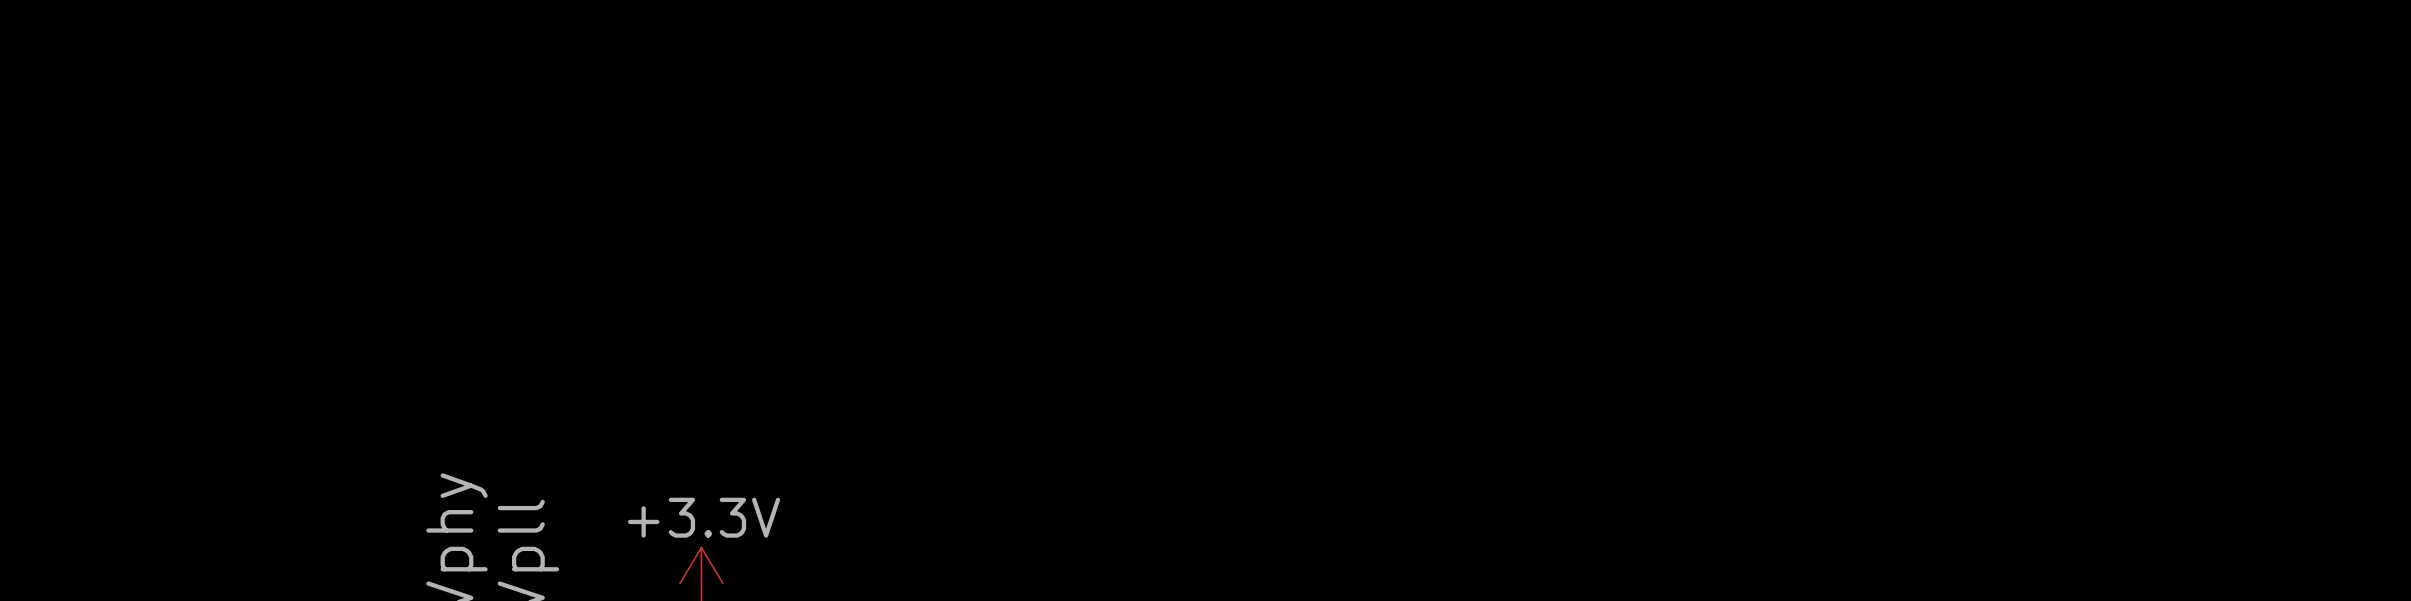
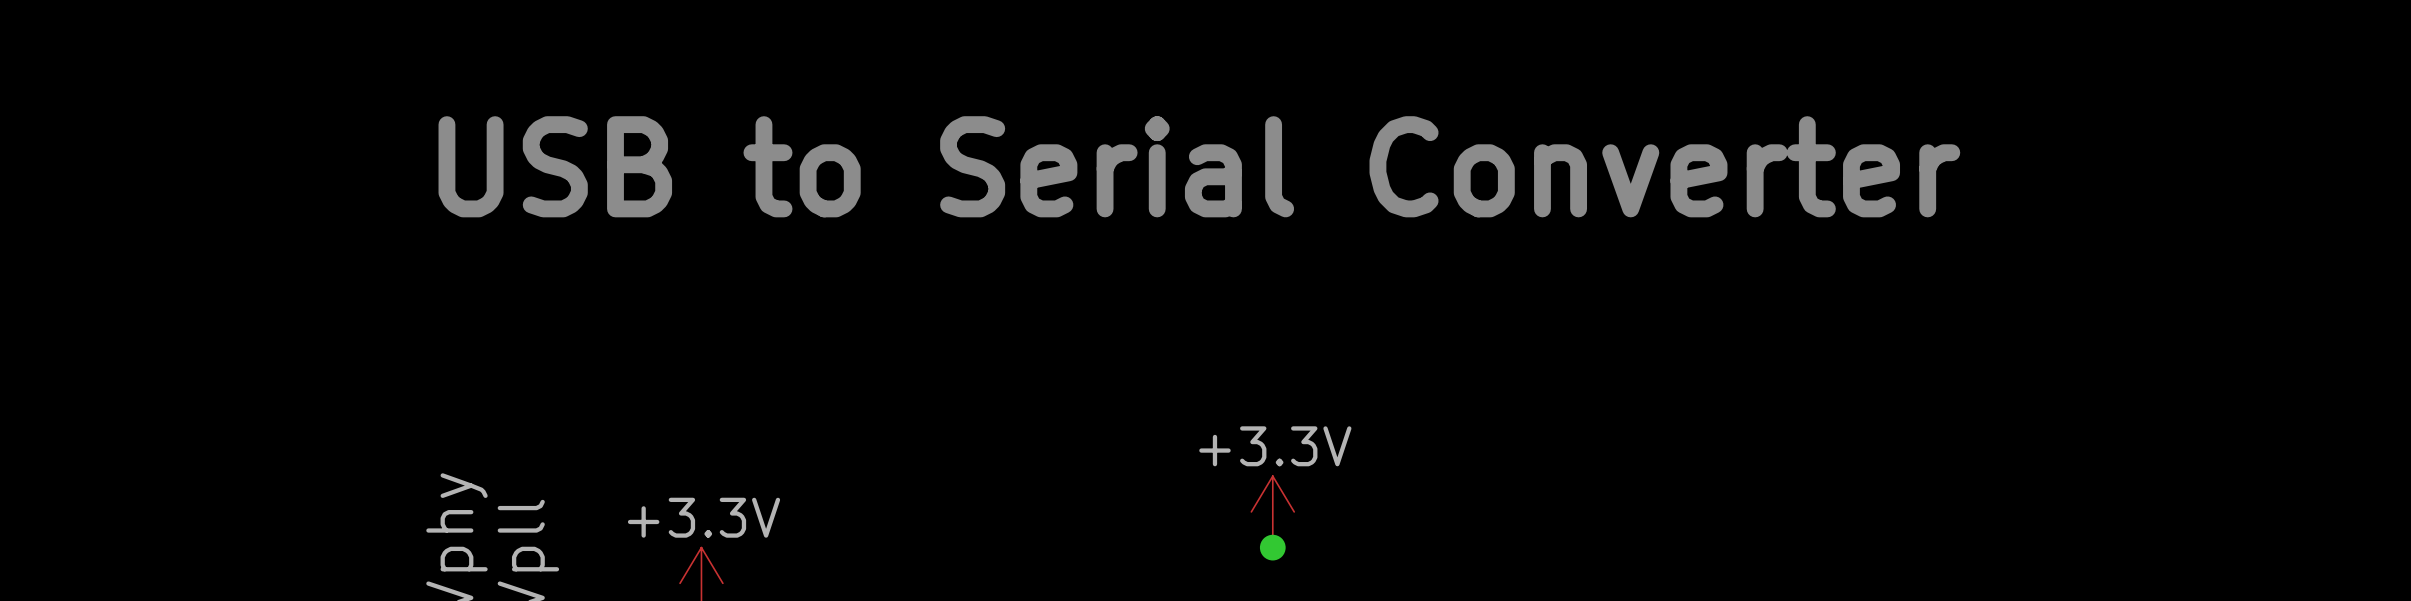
text: none -> USB to Serial Converter (1199, 166)
power symbol: none -> +3.3V (1272, 511)
junction: none -> (1272, 547)

